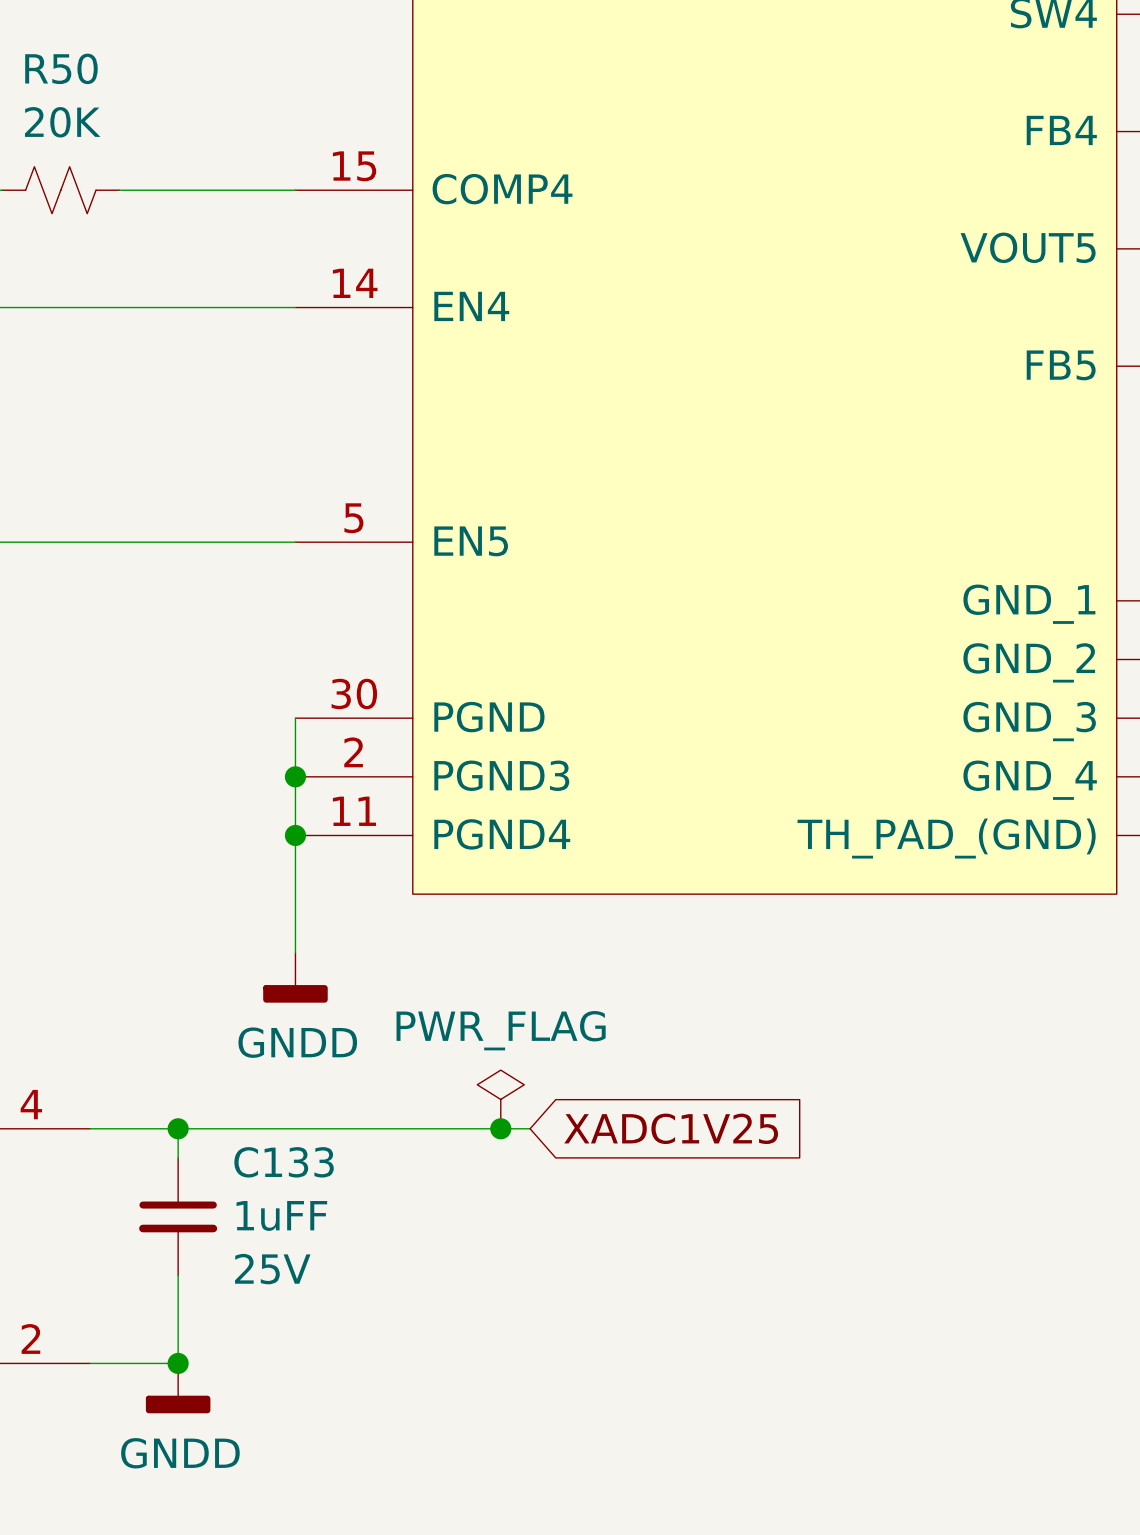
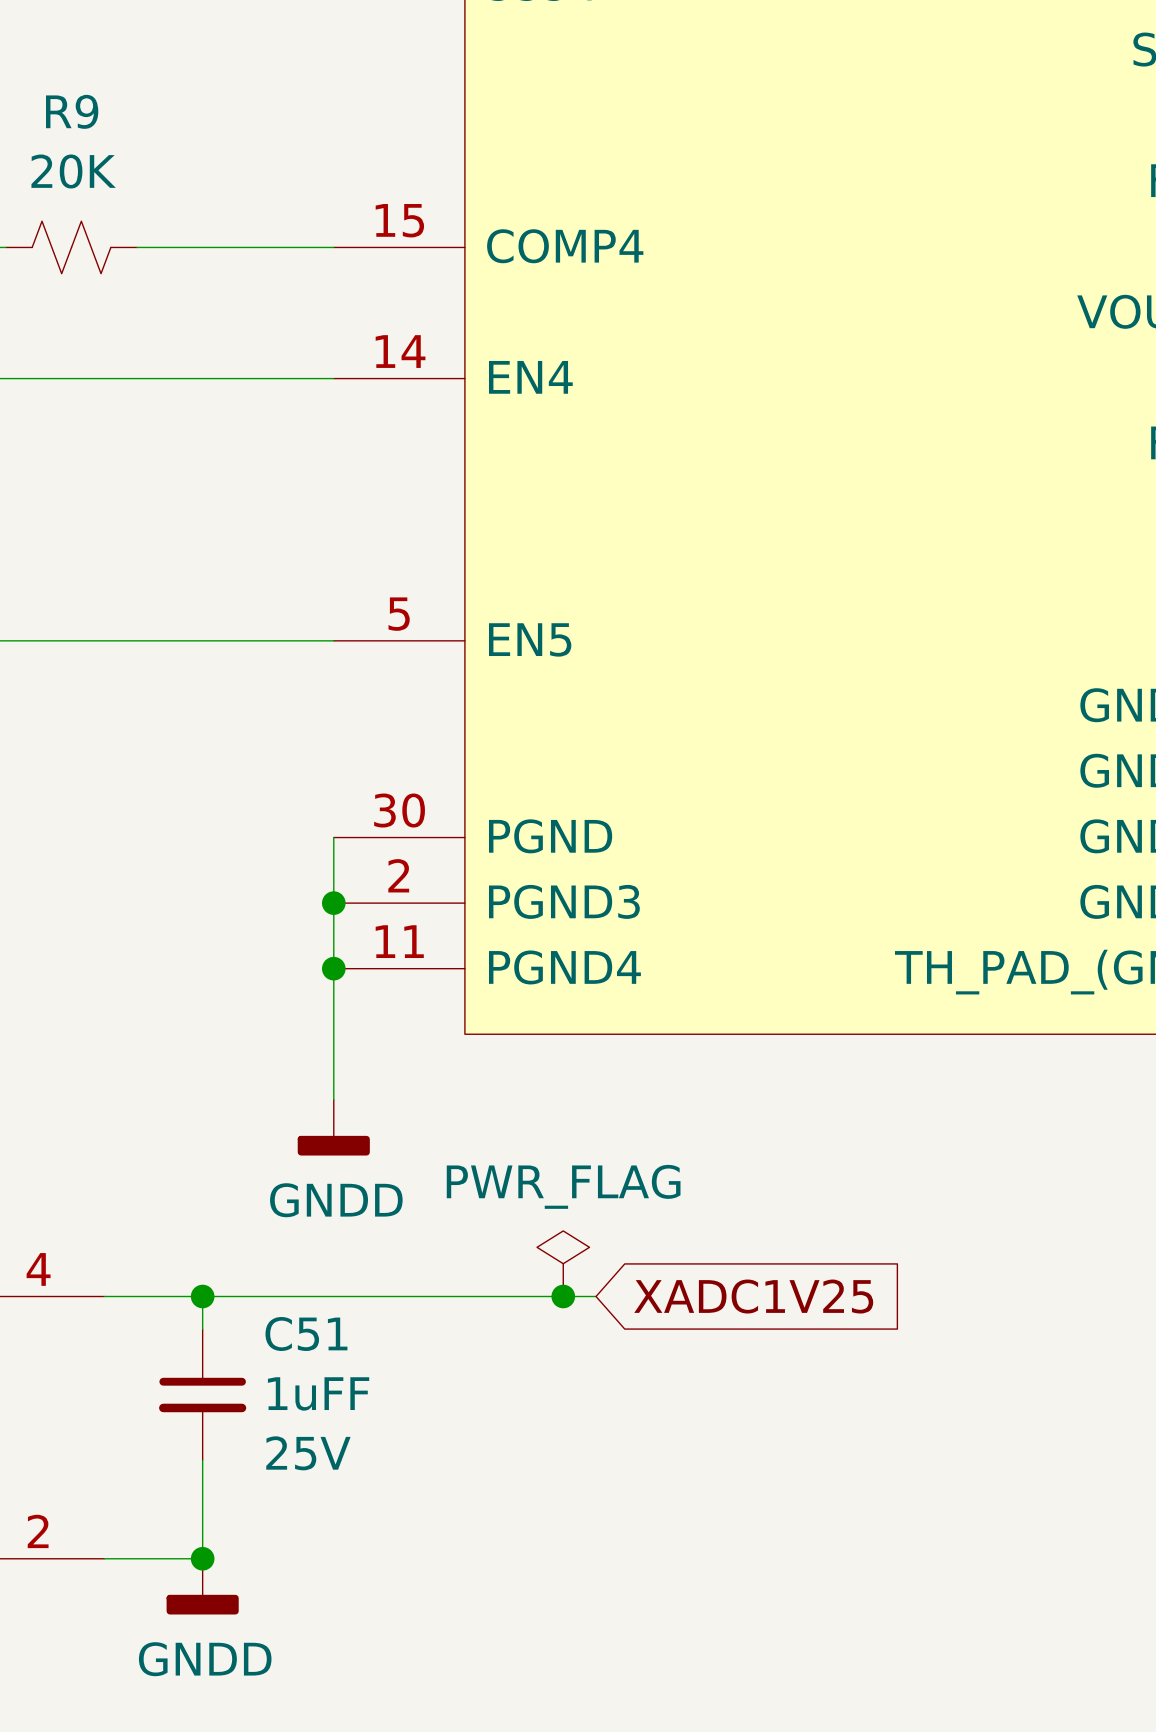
R50 name: R50 (61, 68) -> R9 (72, 111)
C133 name: C133 (284, 1162) -> C51 (306, 1333)

